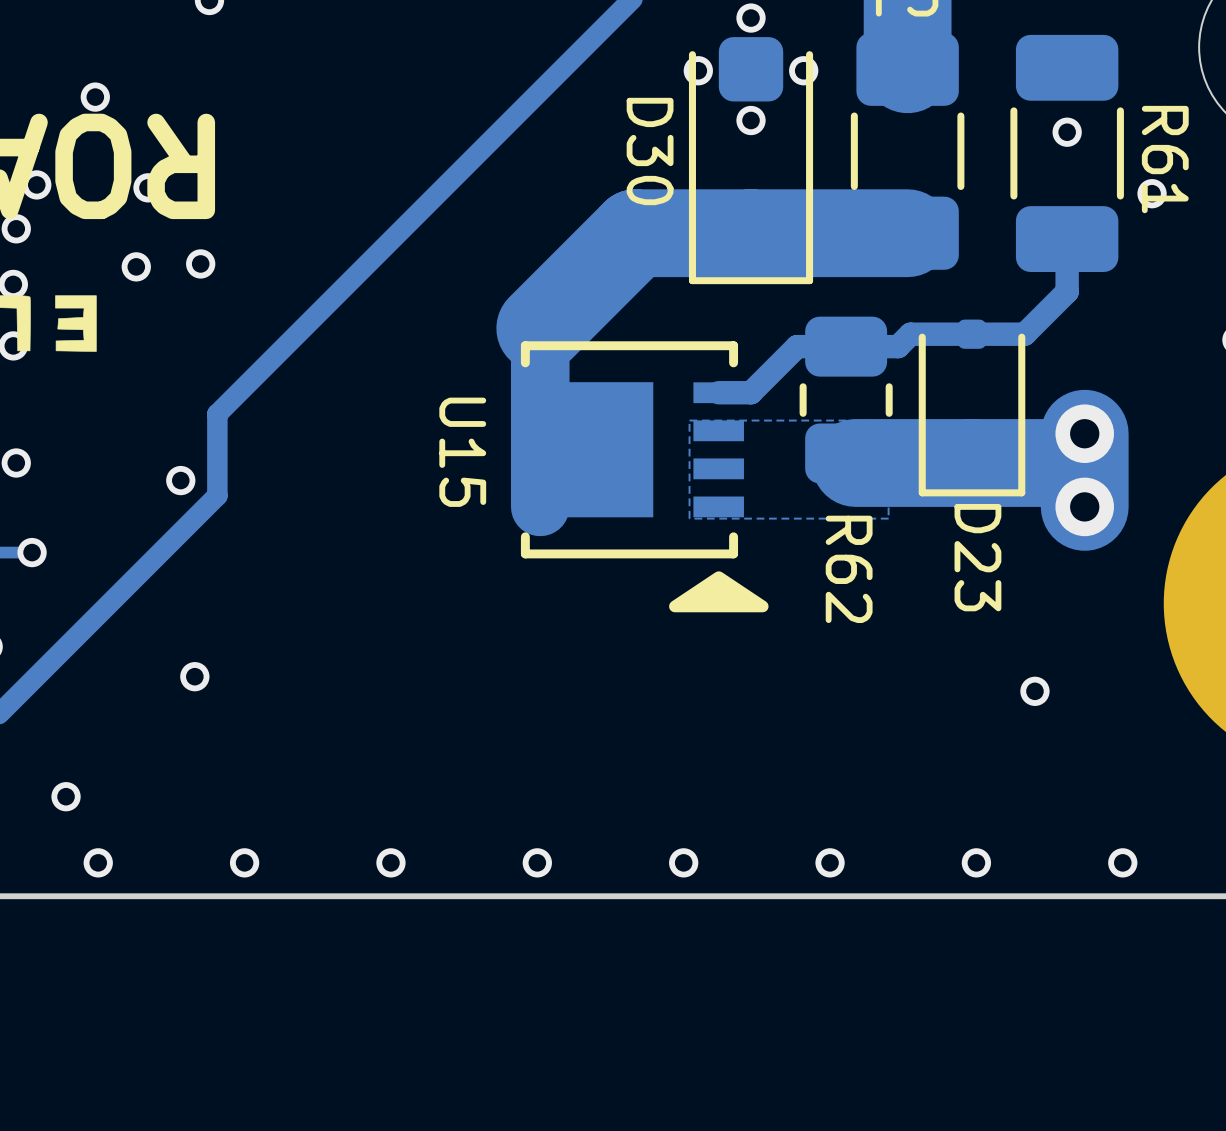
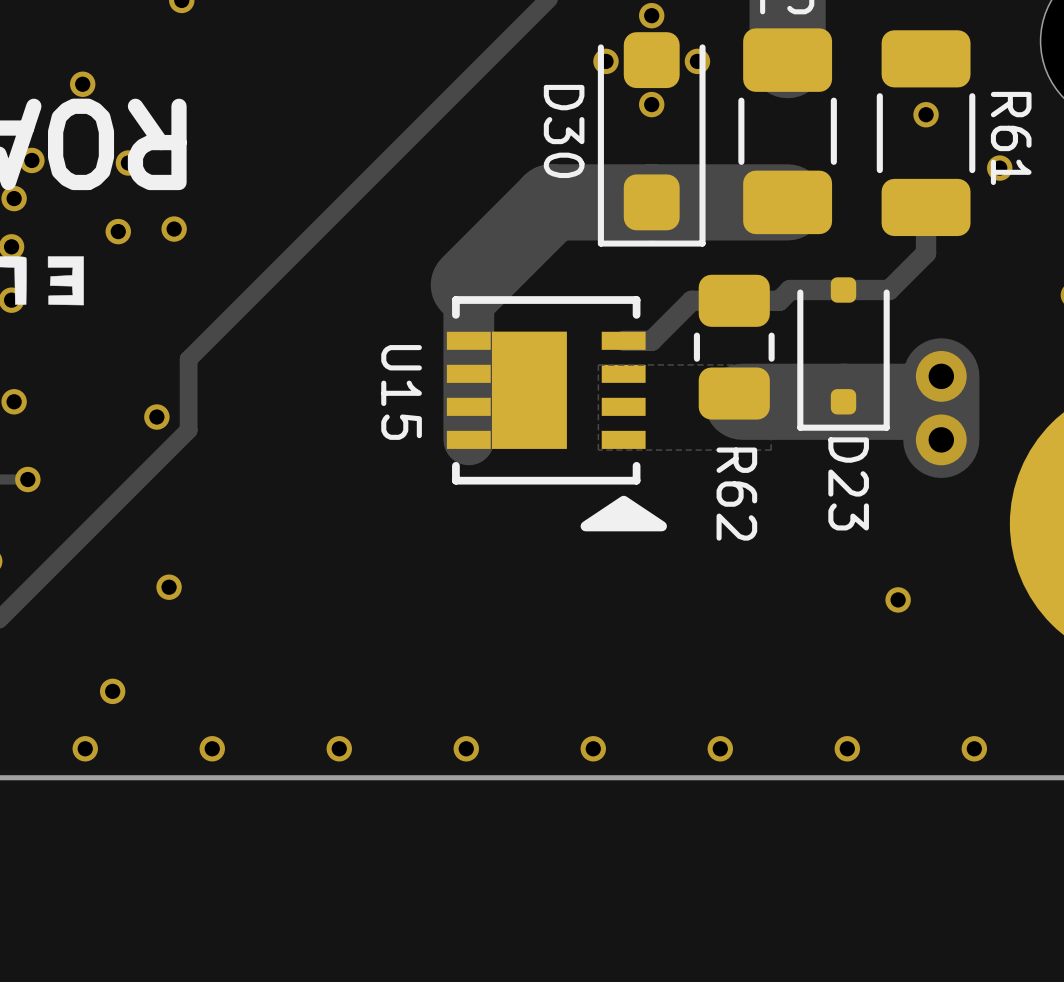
via position: (66, 796) -> (112, 691)

